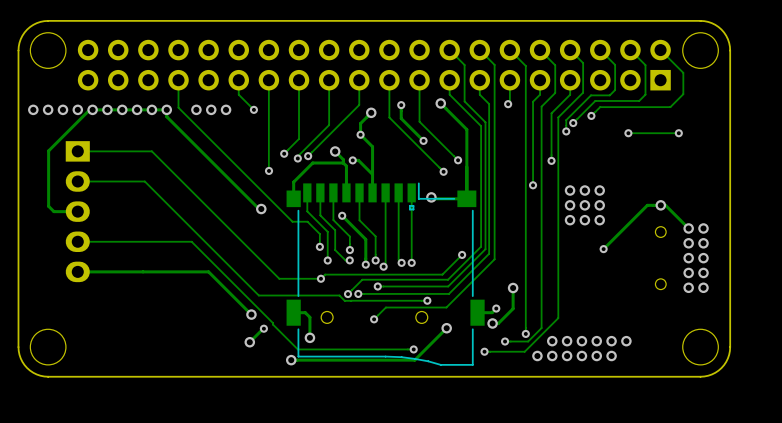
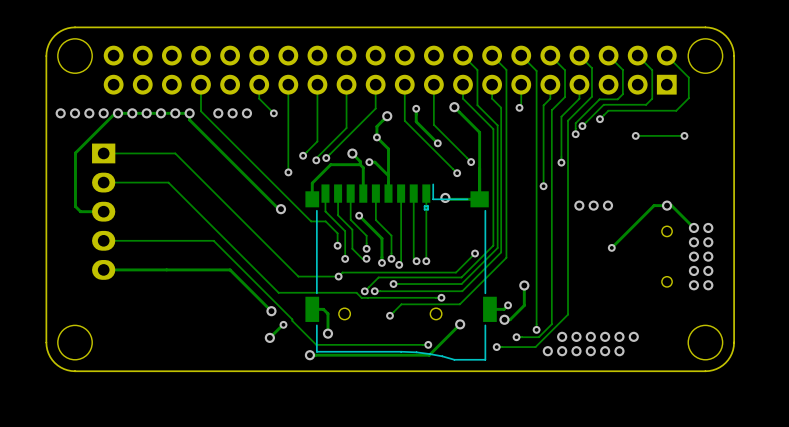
via: (570, 190) -> none
via: (584, 190) -> none
via: (599, 190) -> none
via: (570, 220) -> none
via: (584, 220) -> none
via: (599, 220) -> none

